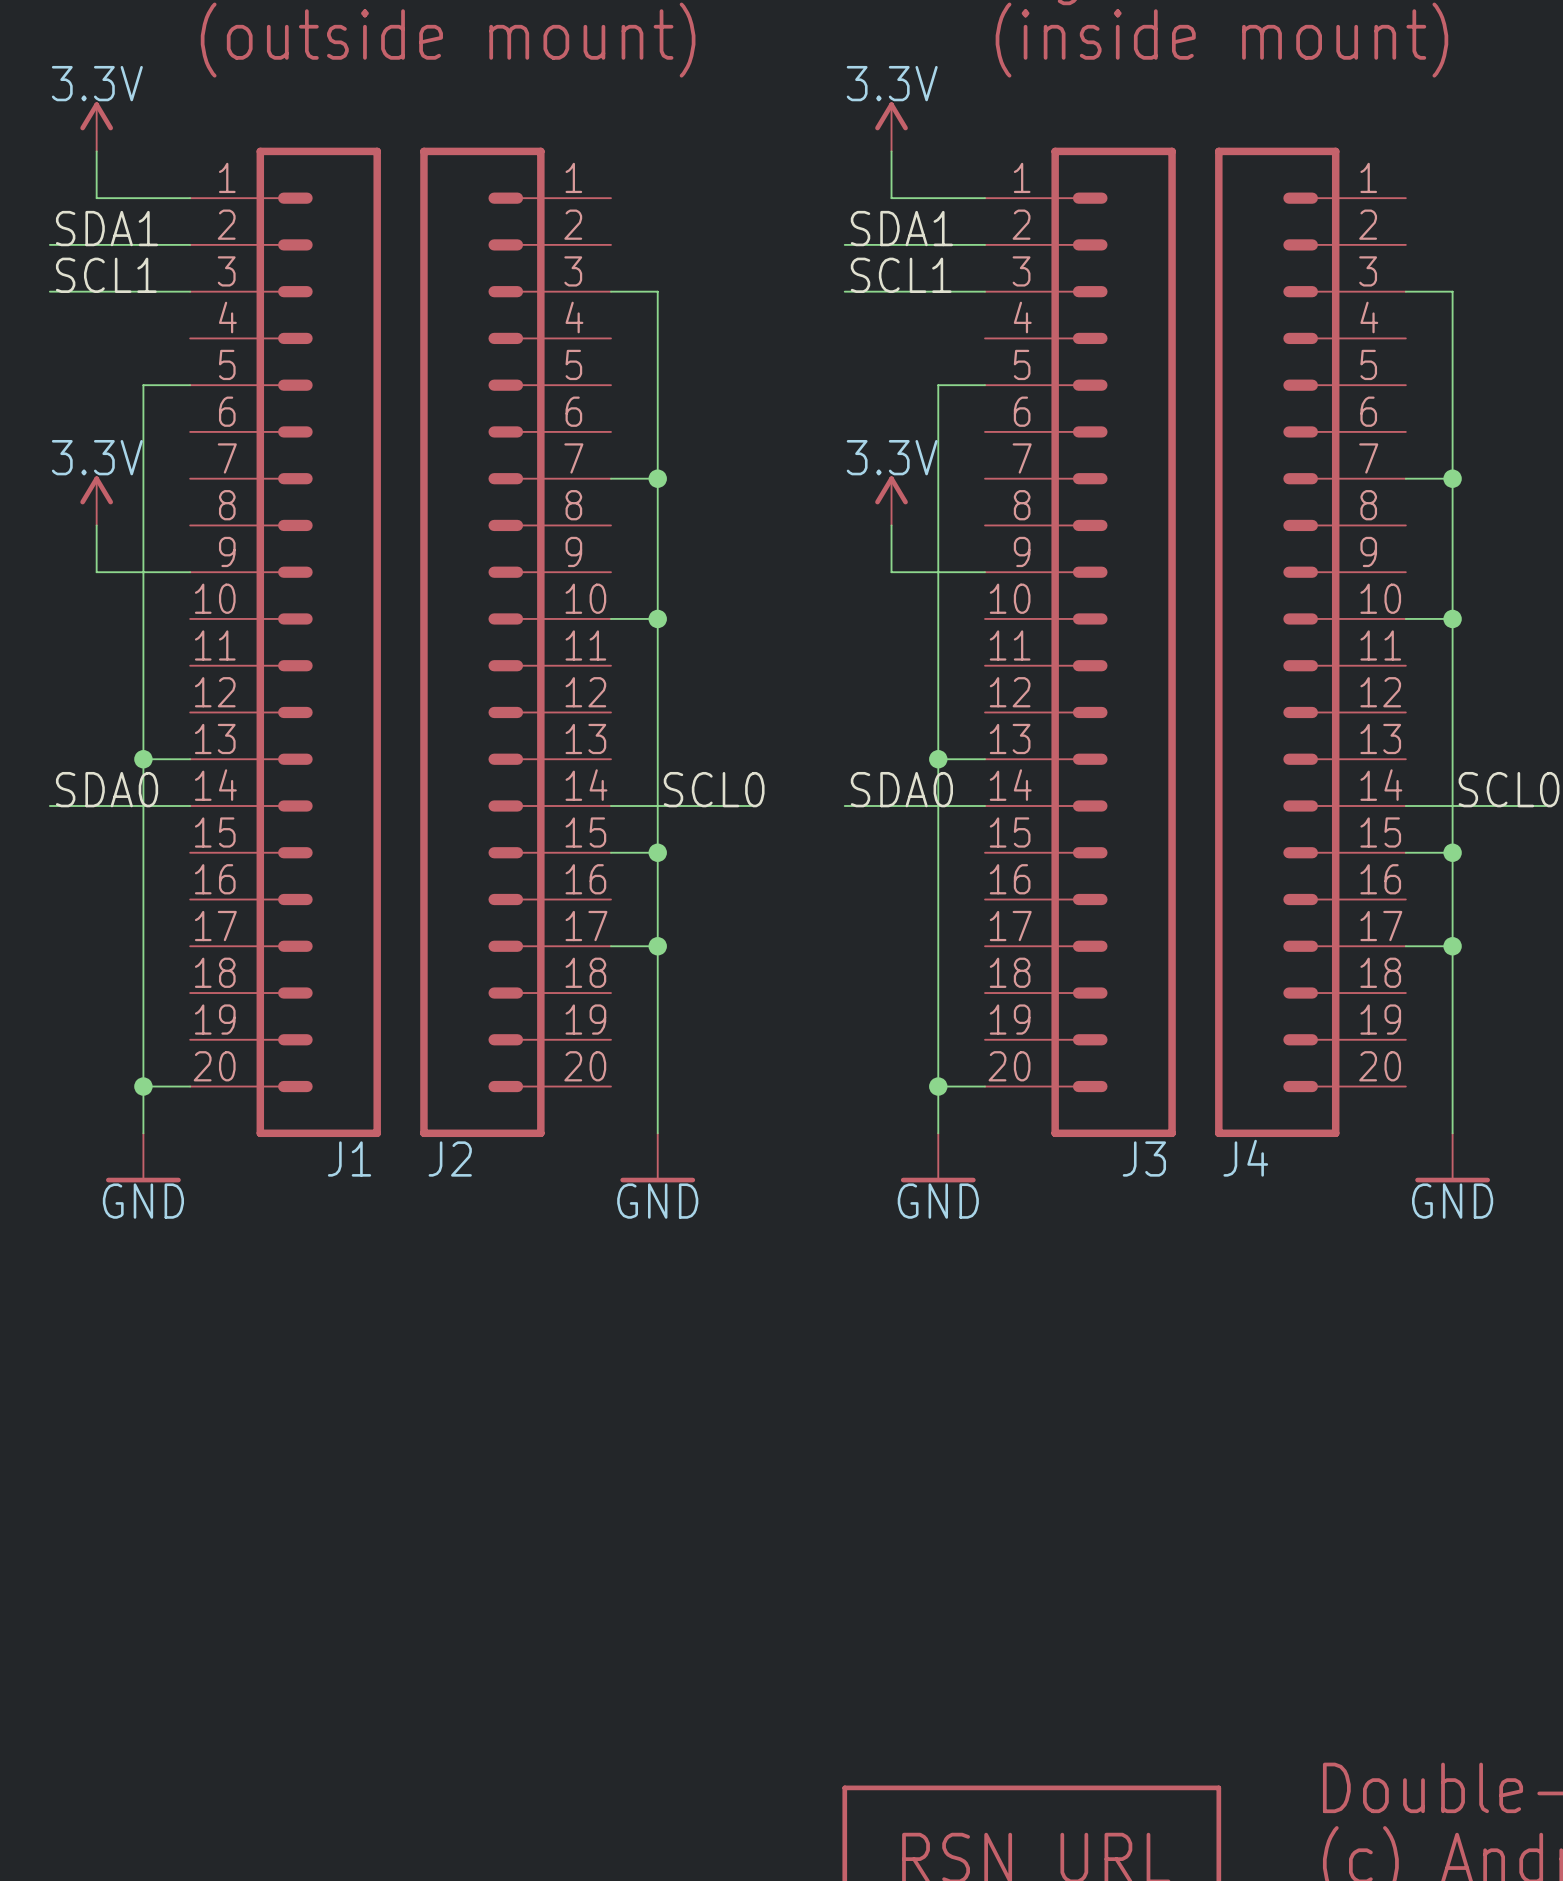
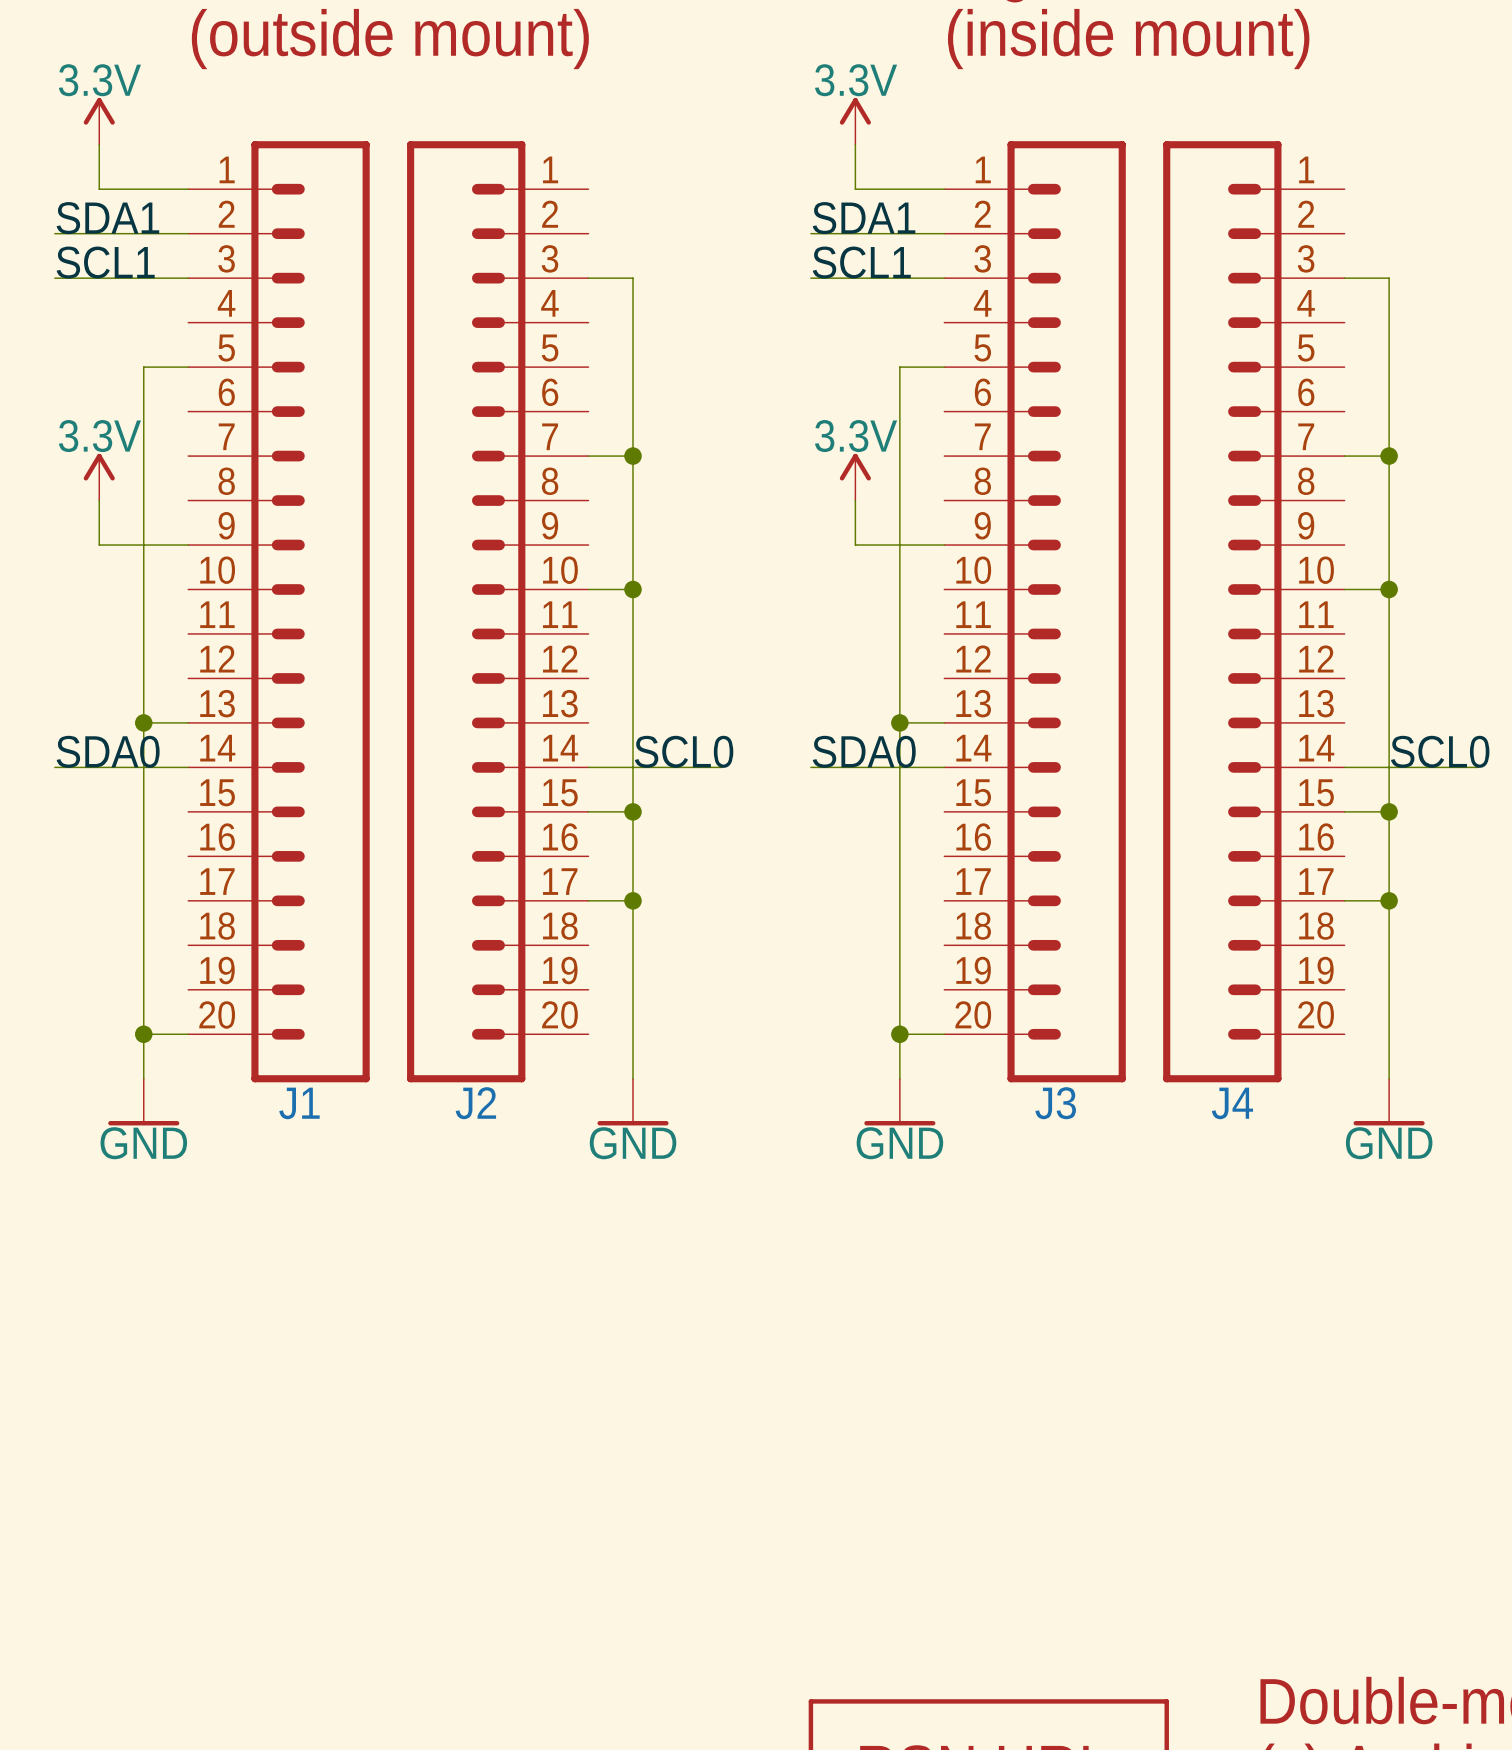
J4 name position: J4 (1245, 1158) -> J4 (1232, 1103)
J1 name position: J1 (349, 1159) -> J1 (299, 1103)
J2 name position: J2 (450, 1159) -> J2 (475, 1103)
J3 name position: J3 (1144, 1159) -> J3 (1055, 1103)

